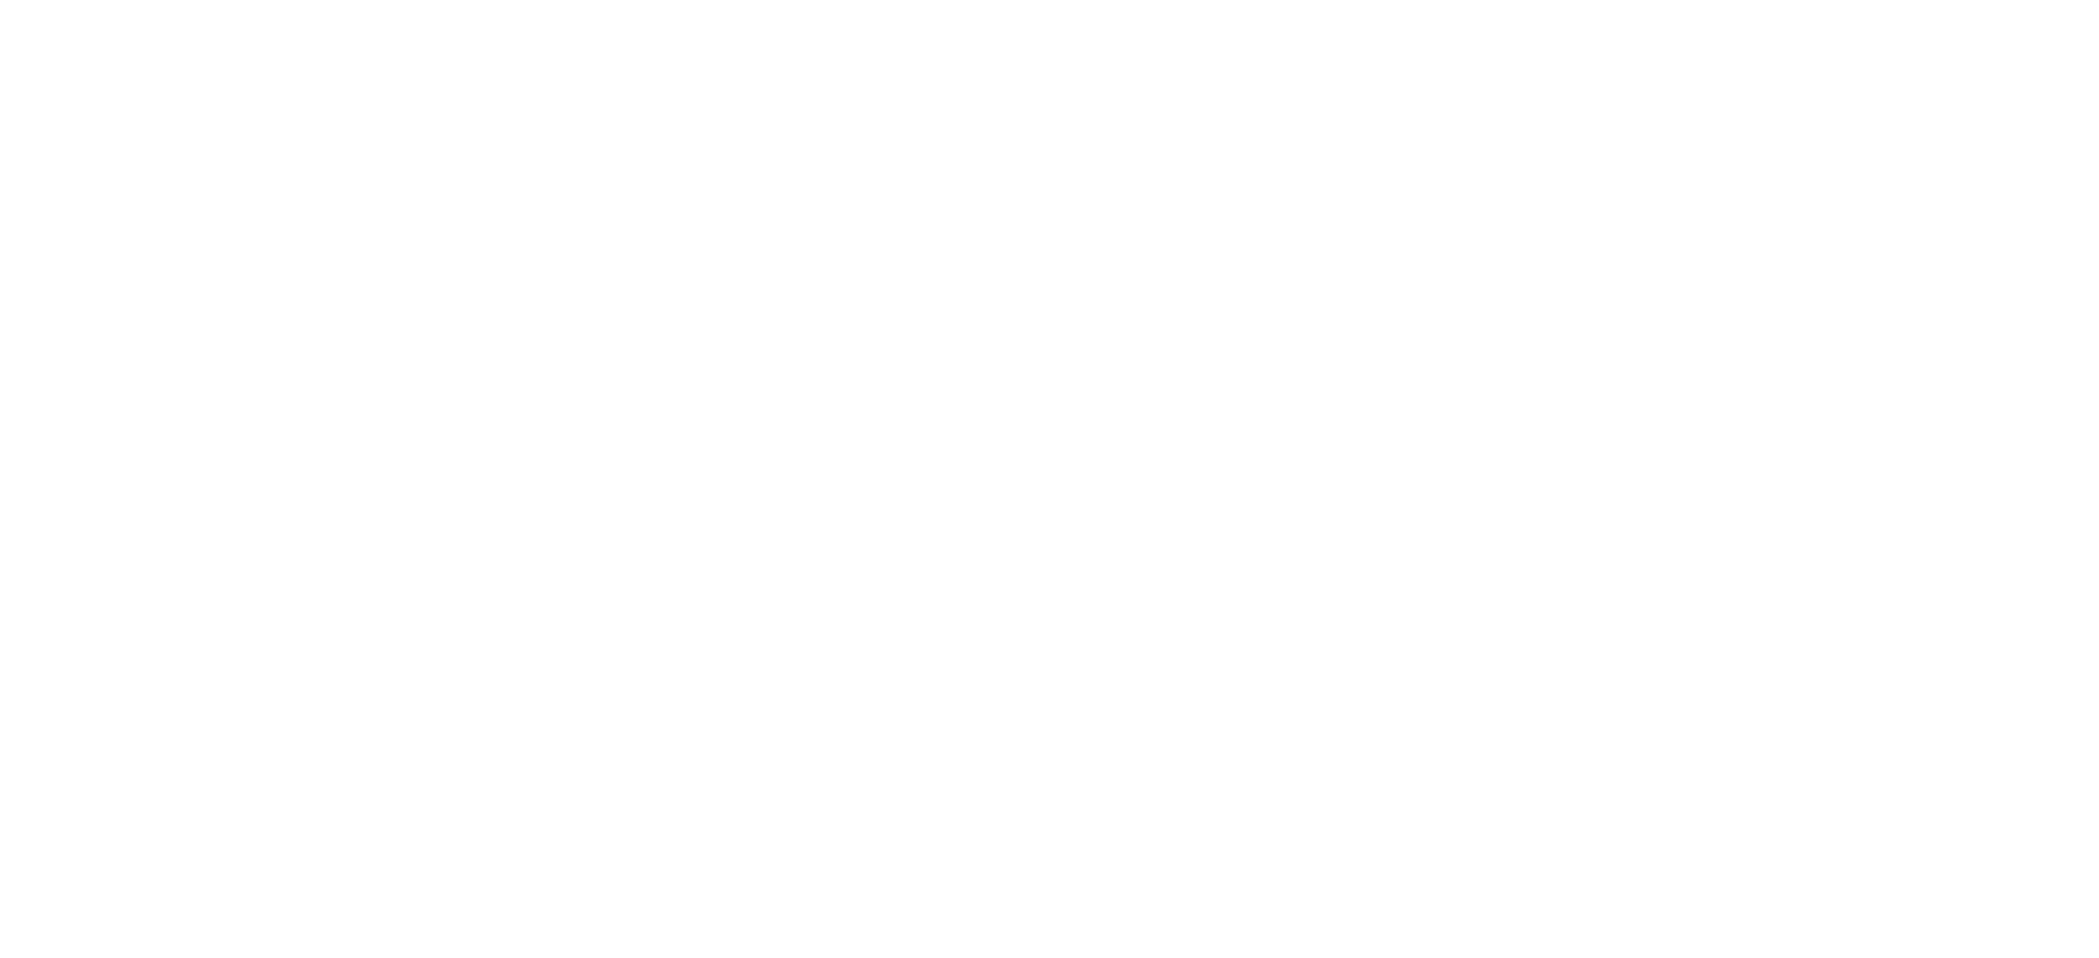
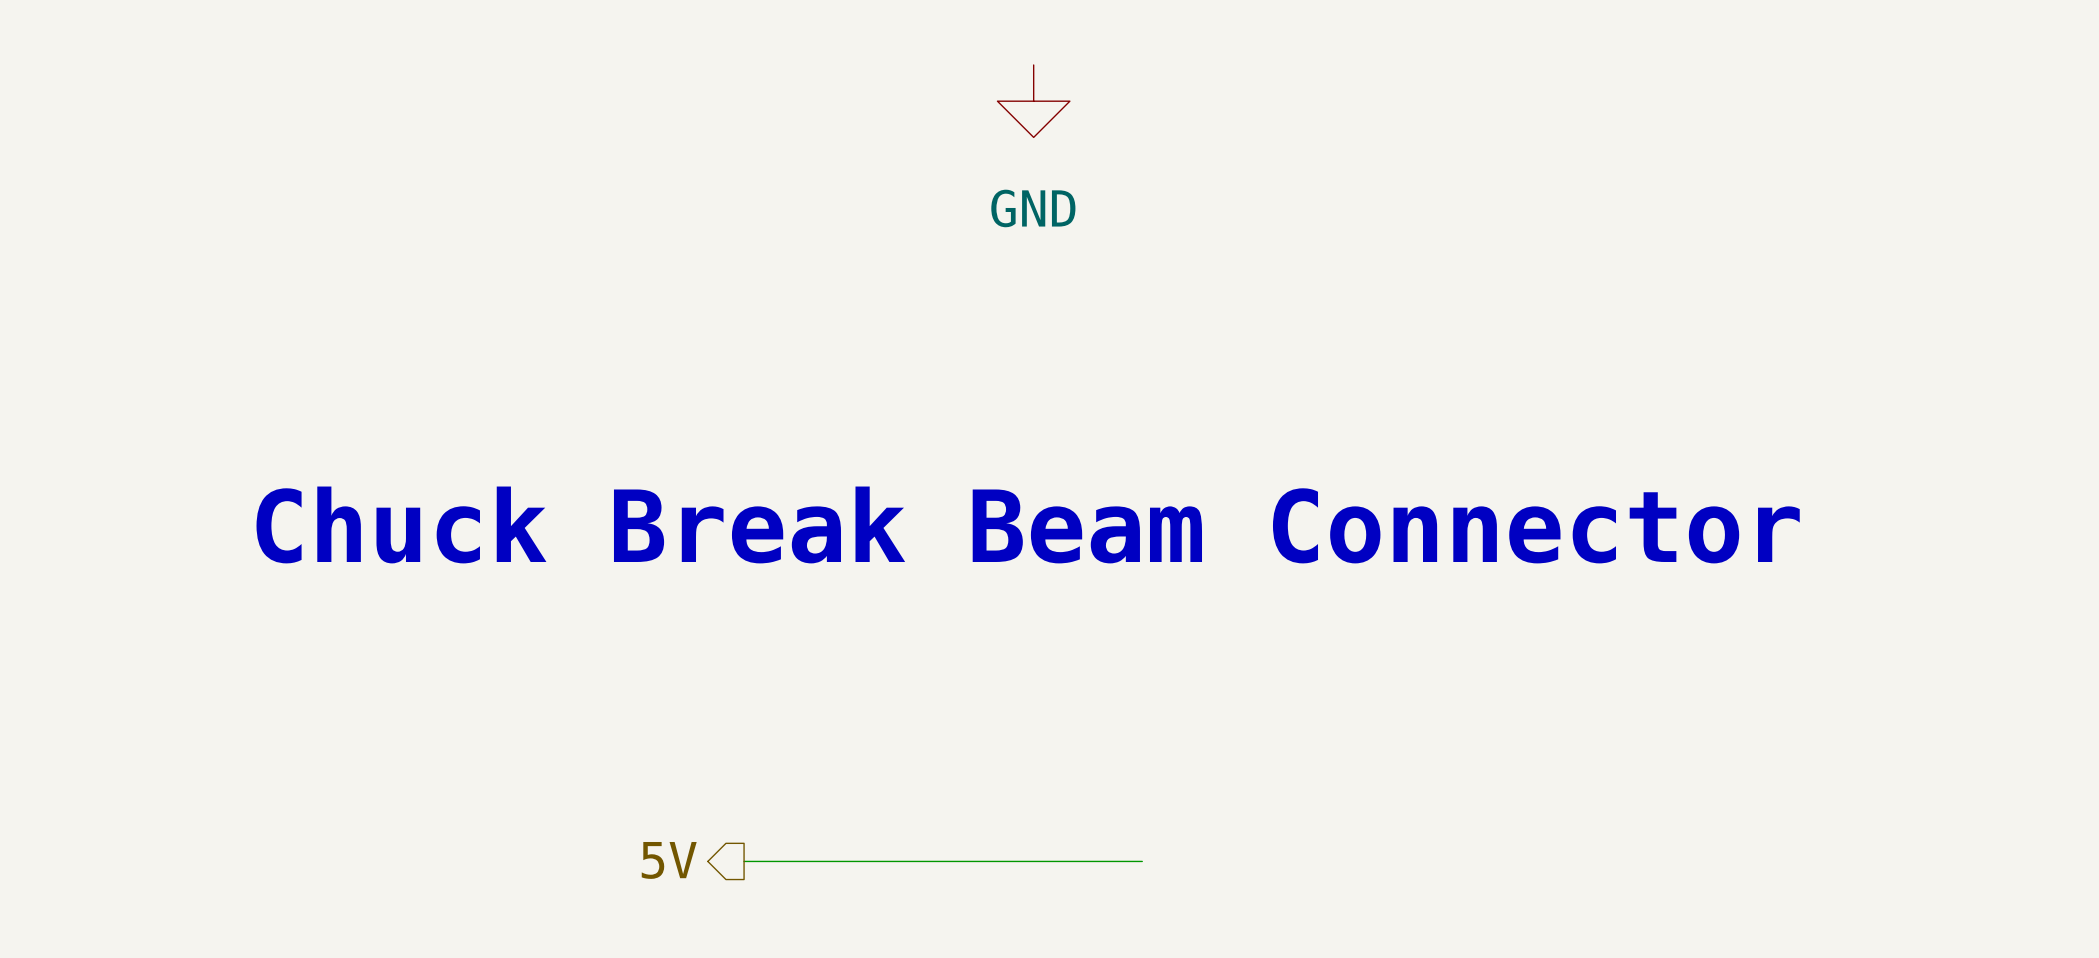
power symbol: none -> GND (1033, 101)
text: none -> Chuck Break Beam Connector (1028, 524)
hierarchical label: none -> 5V (669, 860)
wire: none -> (744, 861) (1142, 861)

